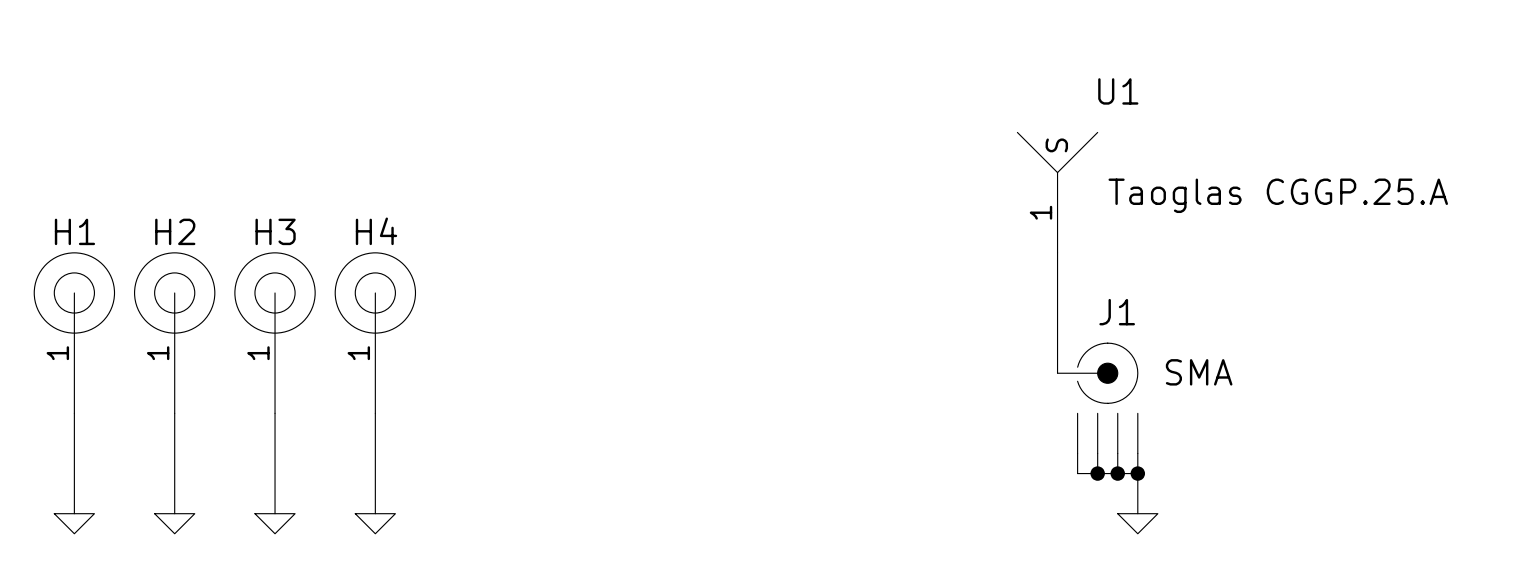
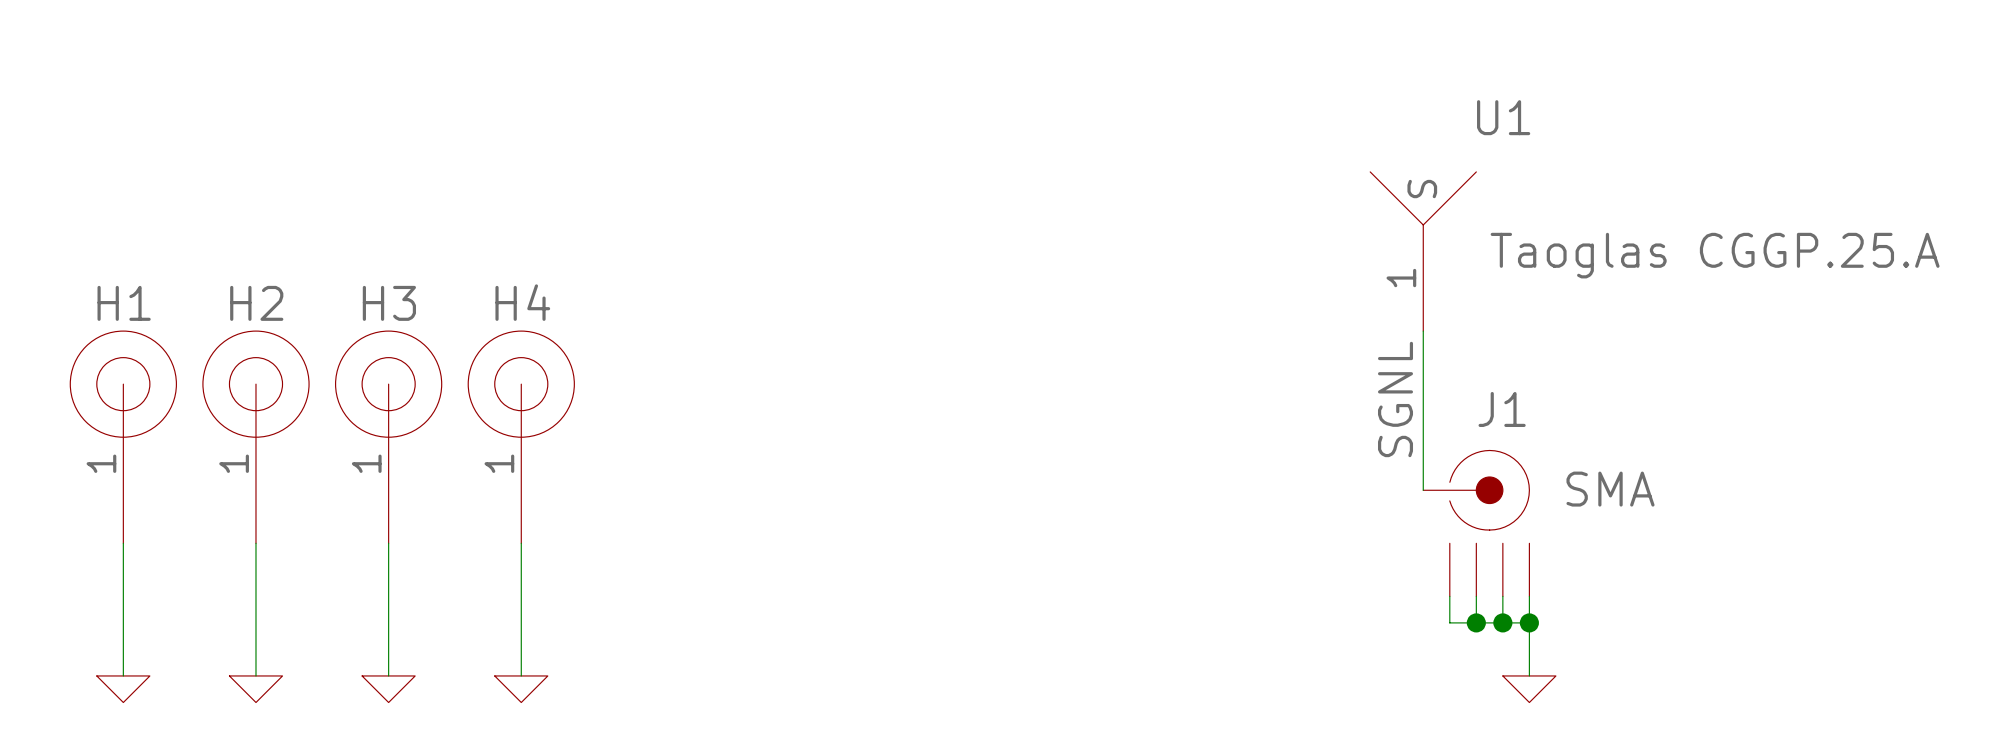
label: none -> SGNL (1395, 399)

